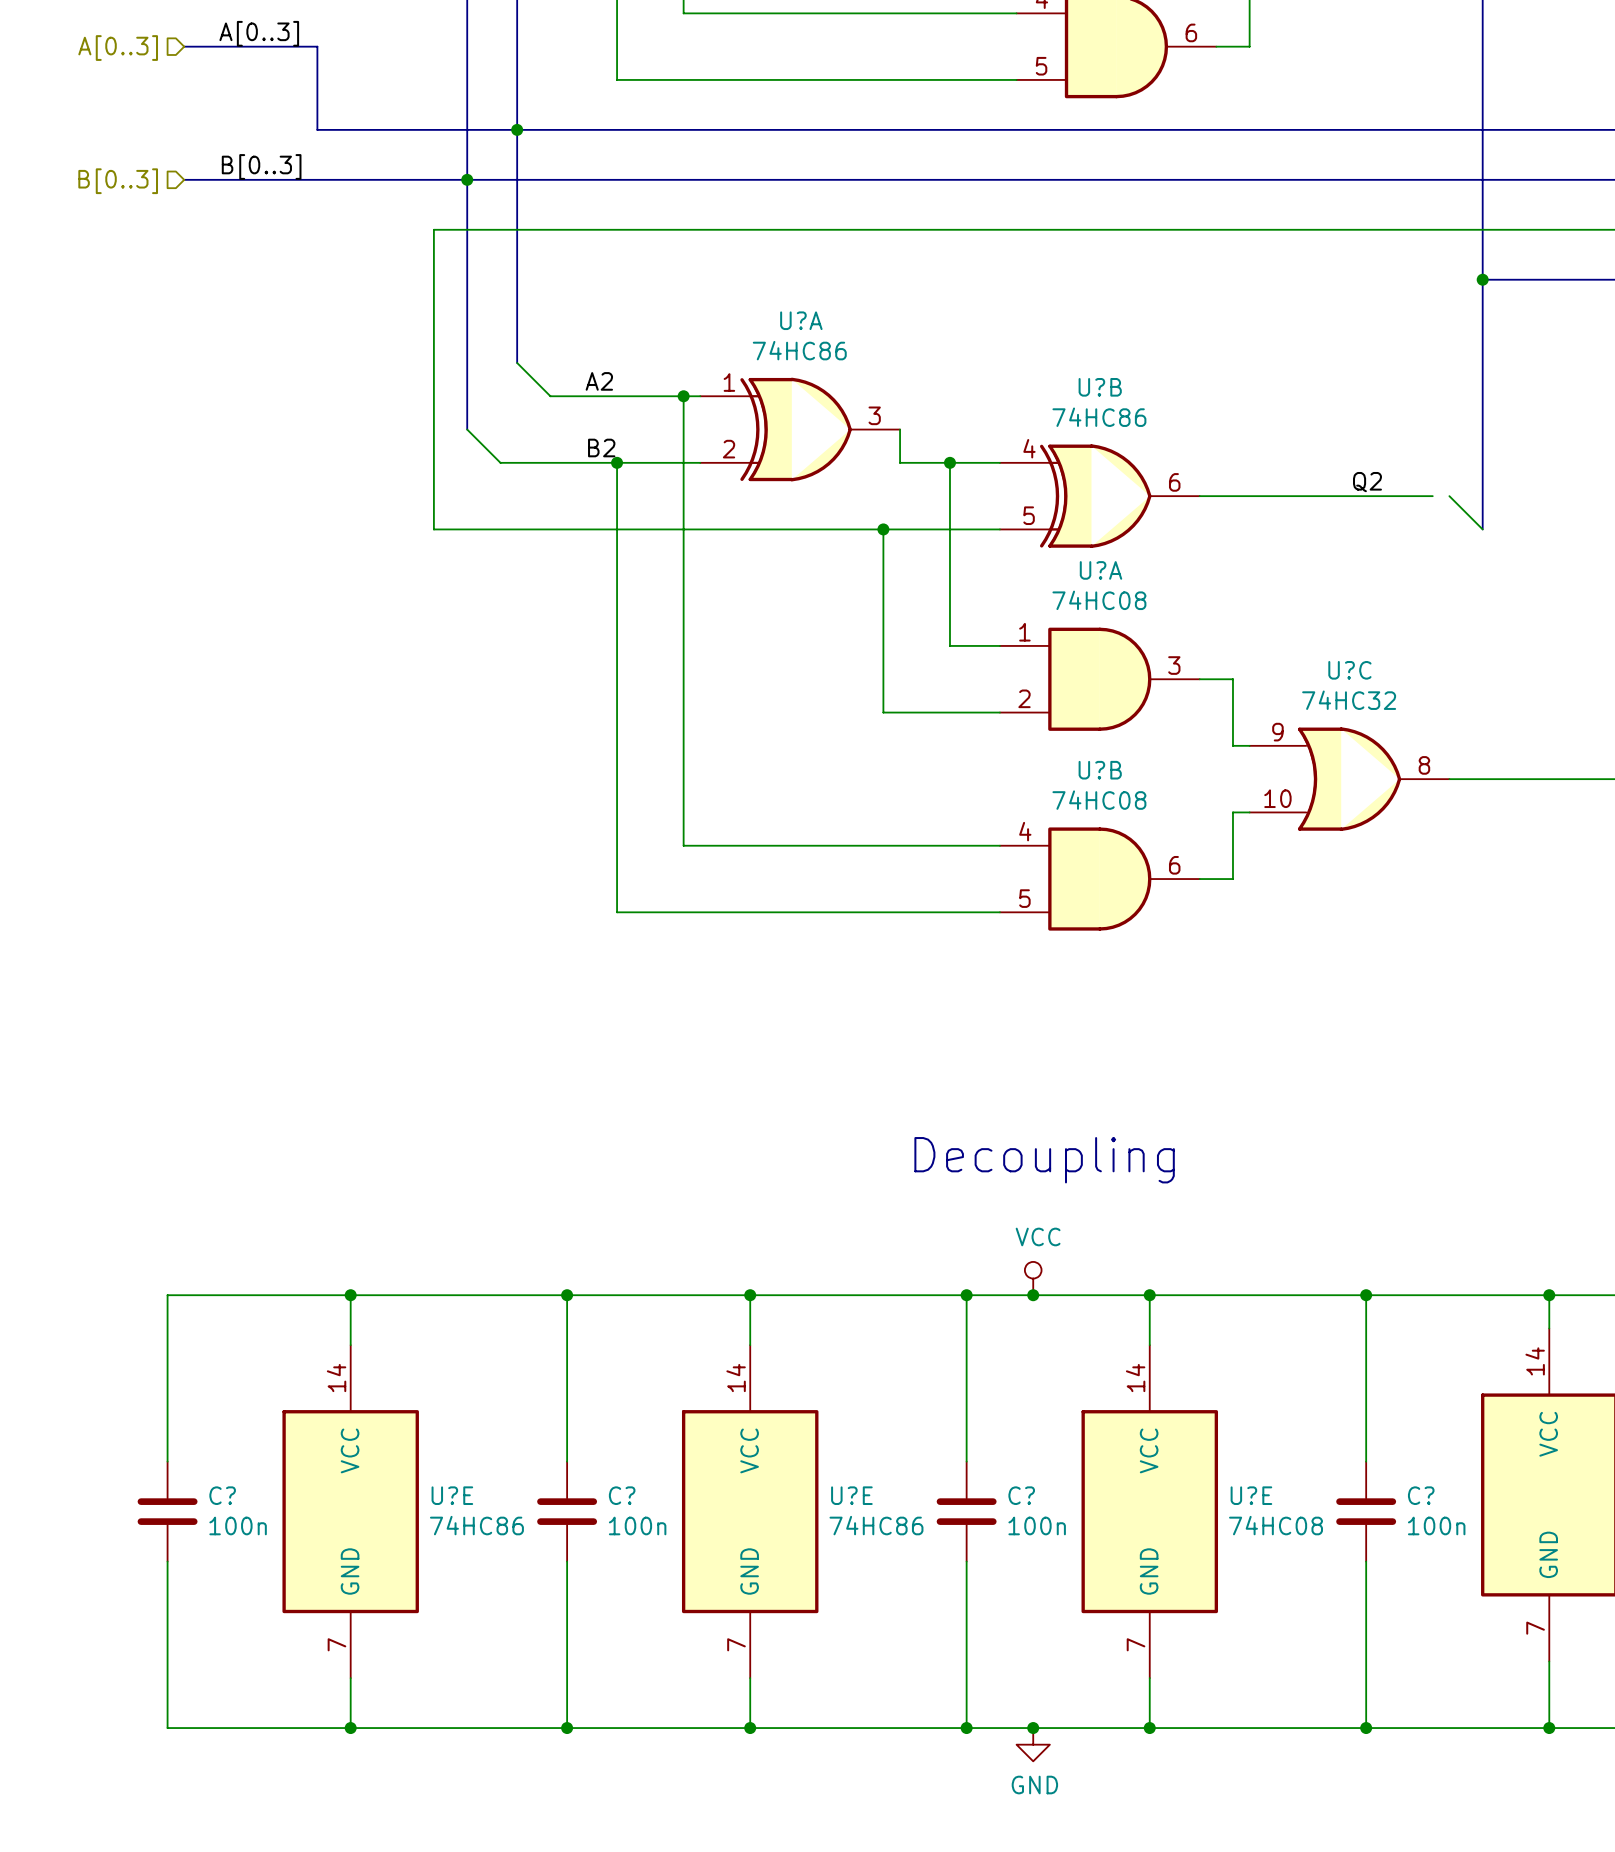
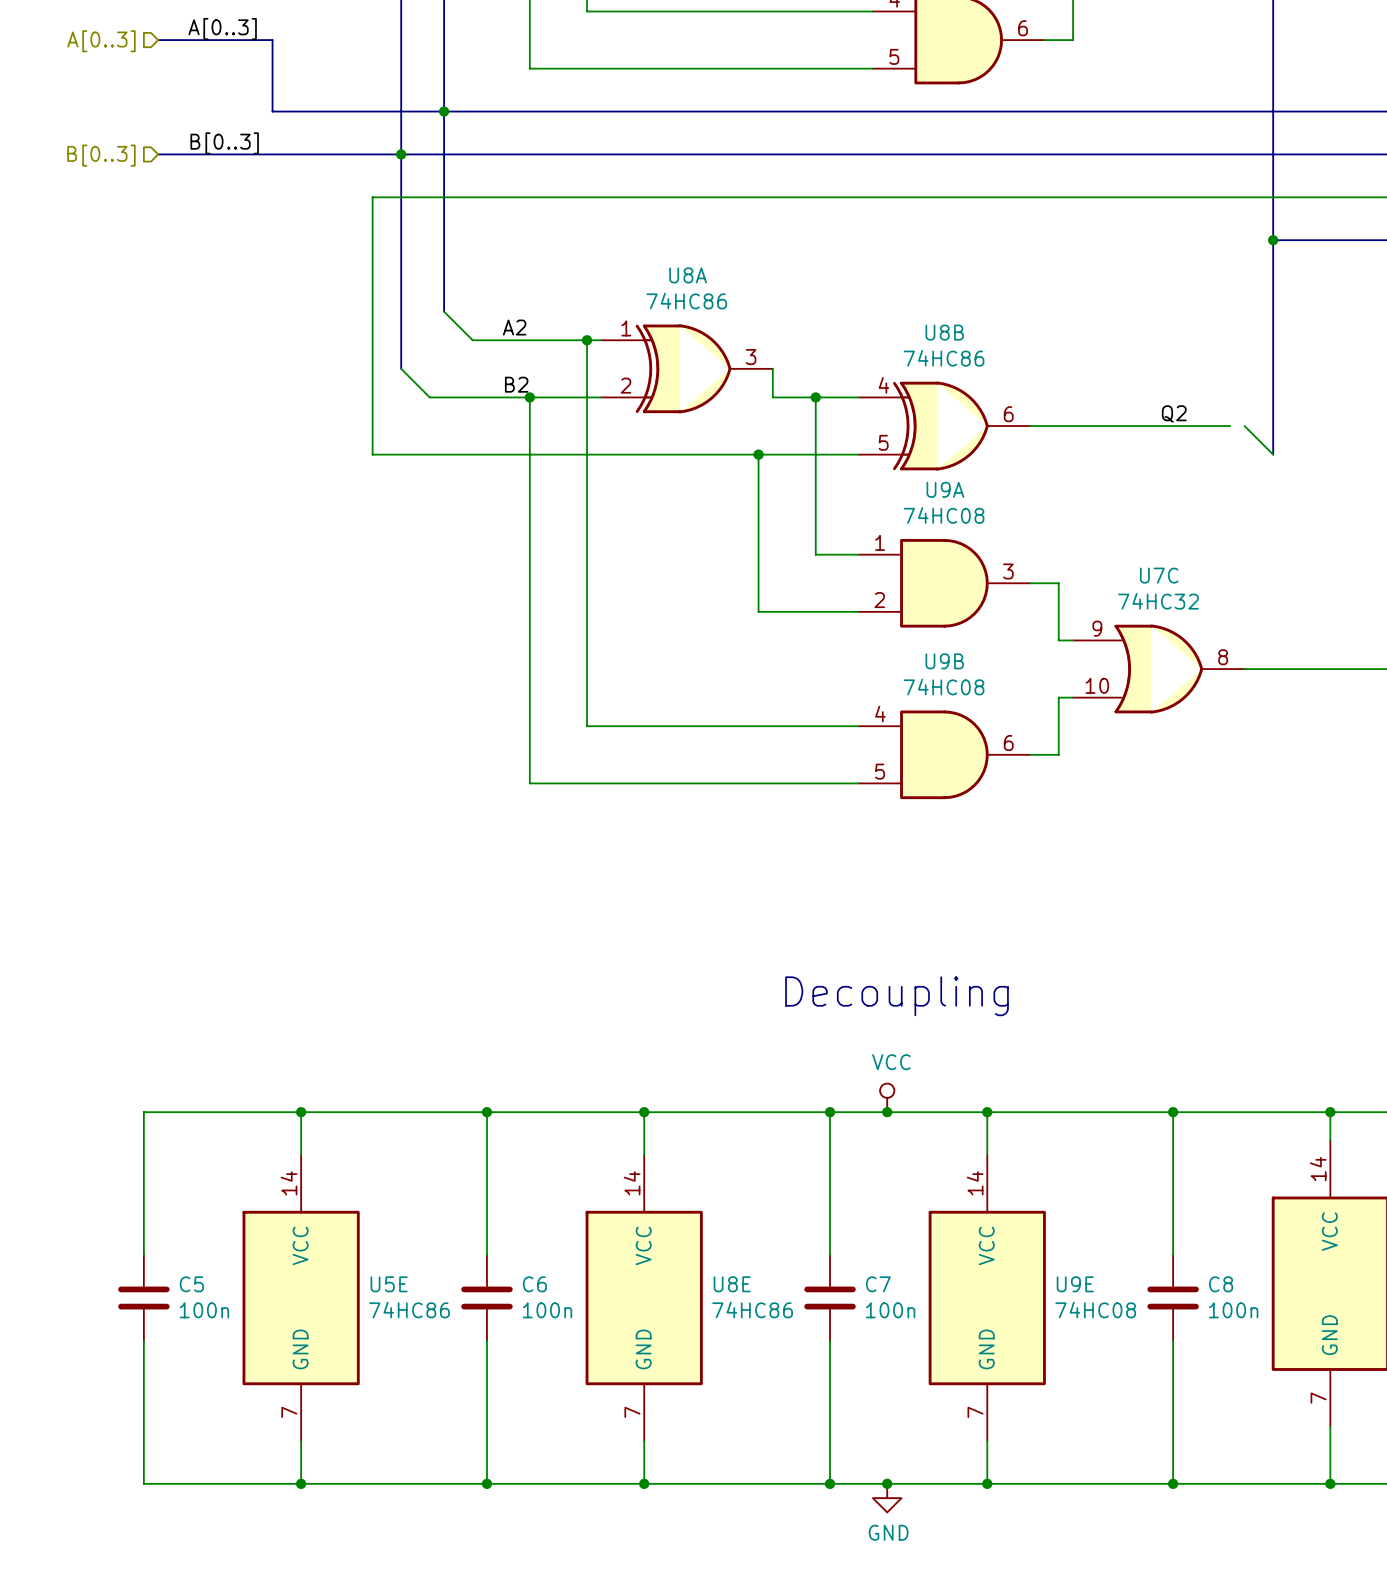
U?A name: U?A (801, 320) -> U8A (688, 275)
U?B name: U?B (1100, 387) -> U8B (944, 332)
U?A name: U?A (1101, 570) -> U9A (945, 489)
U?C name: U?C (1349, 670) -> U7C (1159, 575)
U?B name: U?B (1100, 770) -> U9B (944, 661)
C? name: C? (222, 1495) -> C5 (191, 1284)
U?E name: U?E (452, 1495) -> U5E (389, 1284)
C? name: C? (622, 1495) -> C6 (534, 1284)
U?E name: U?E (851, 1495) -> U8E (732, 1284)
C? name: C? (1021, 1495) -> C7 (878, 1284)
U?E name: U?E (1251, 1495) -> U9E (1075, 1284)
C? name: C? (1421, 1495) -> C8 (1221, 1284)

